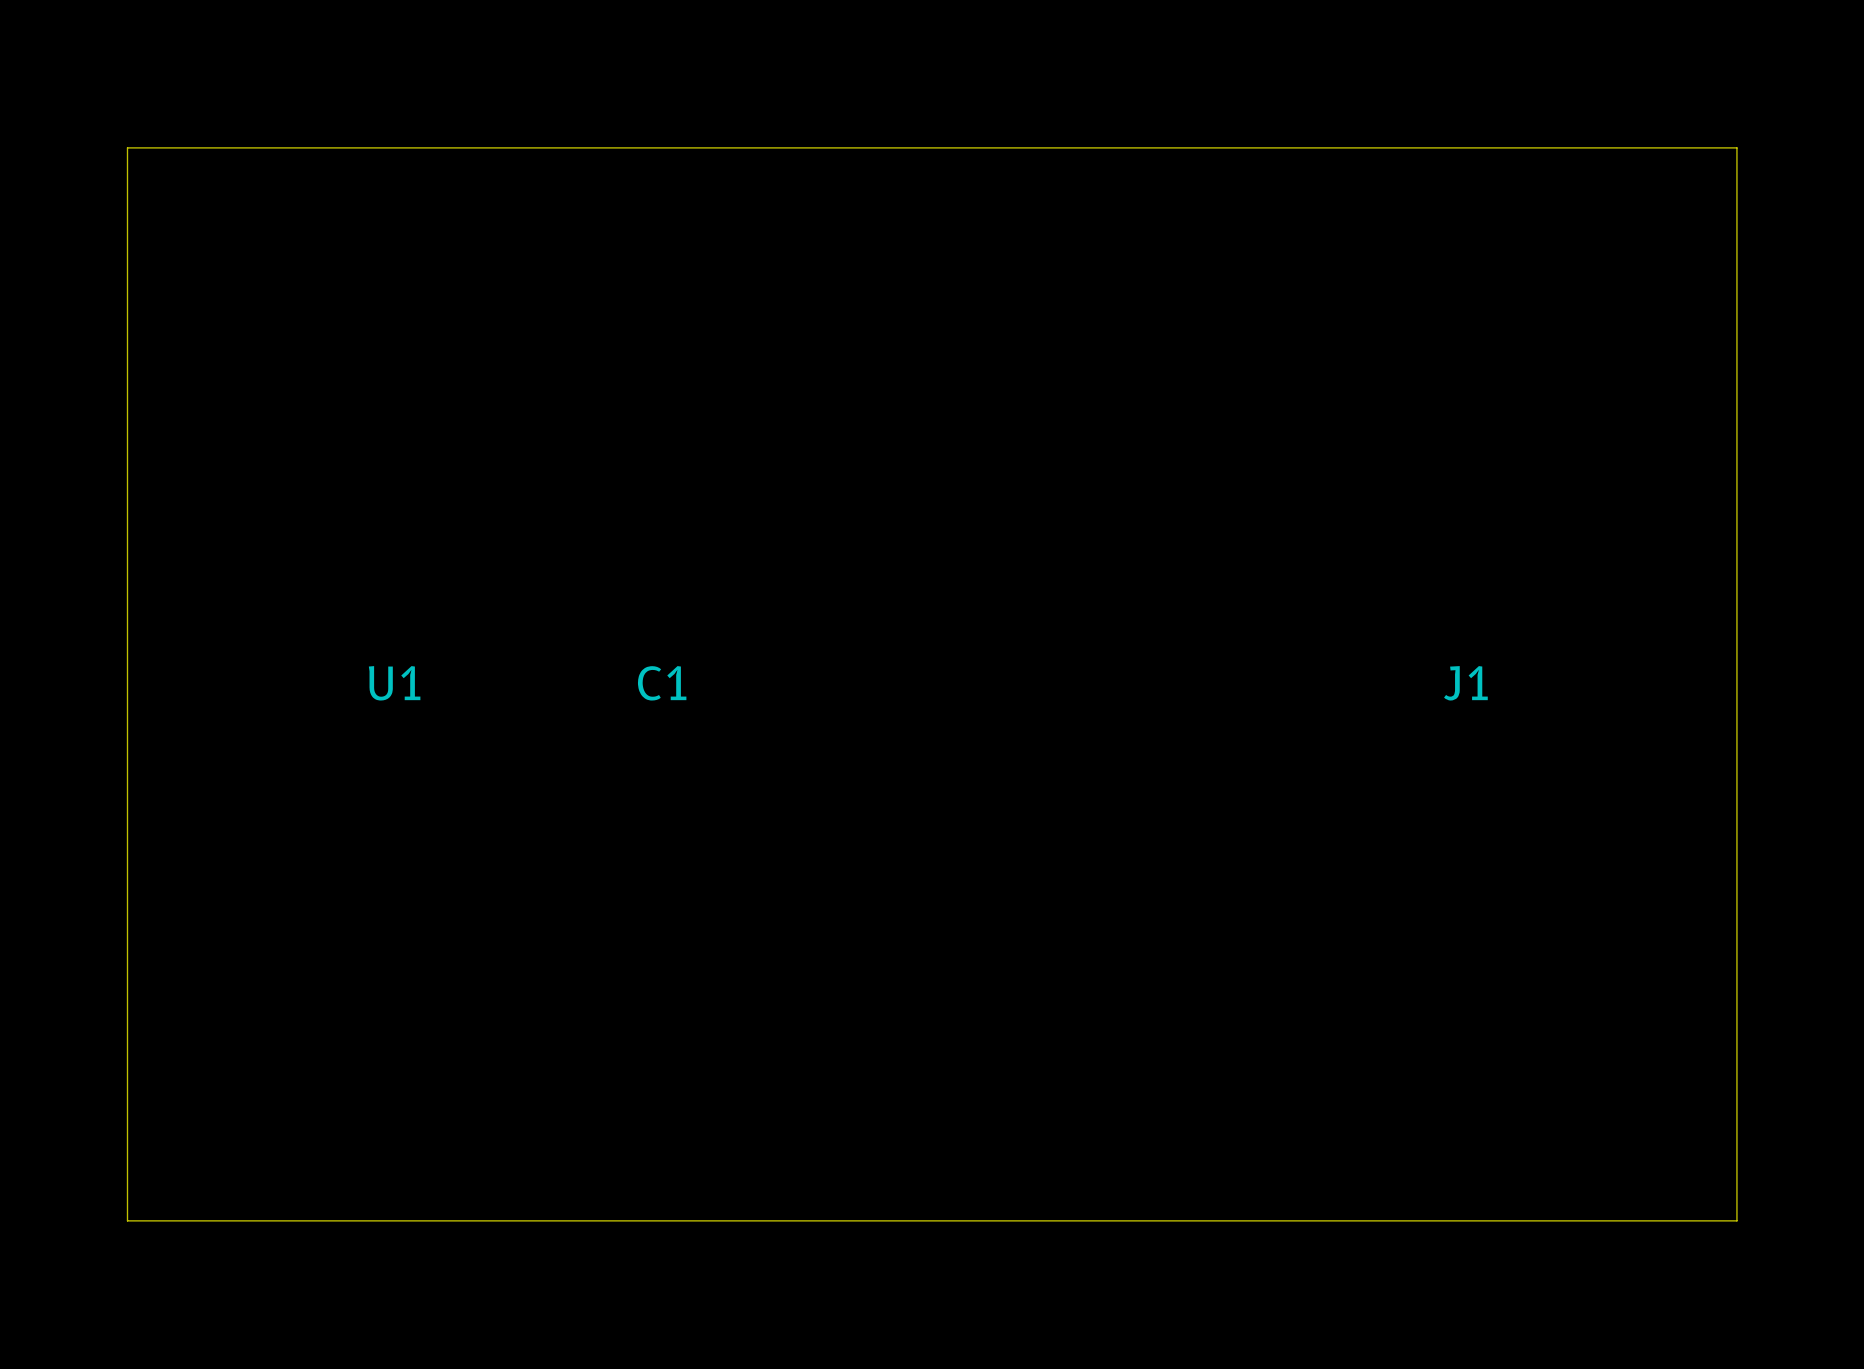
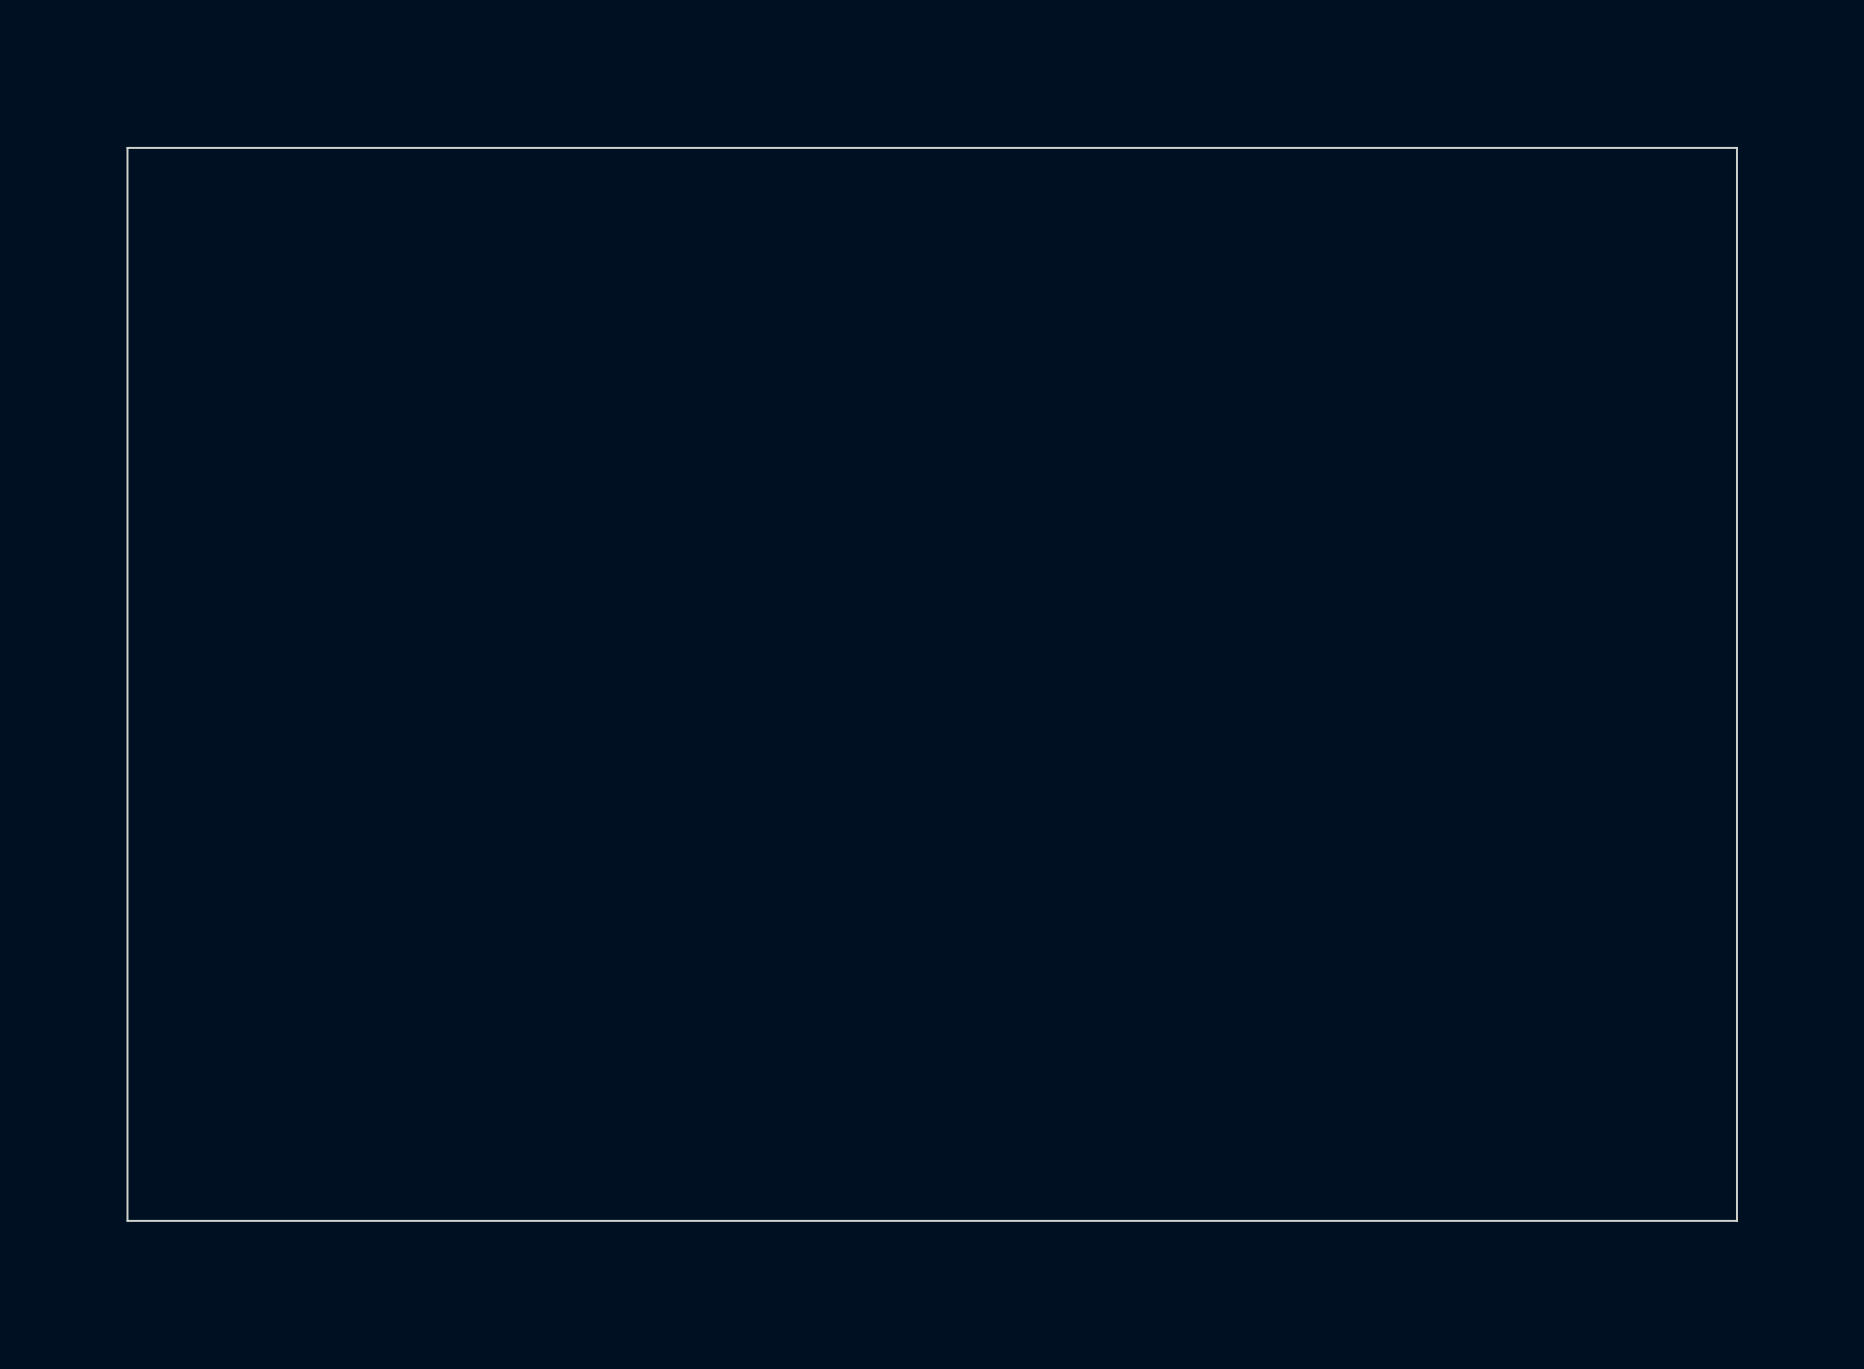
U1: (394, 683) -> none
C1: (662, 683) -> none
J1: (1465, 683) -> none

